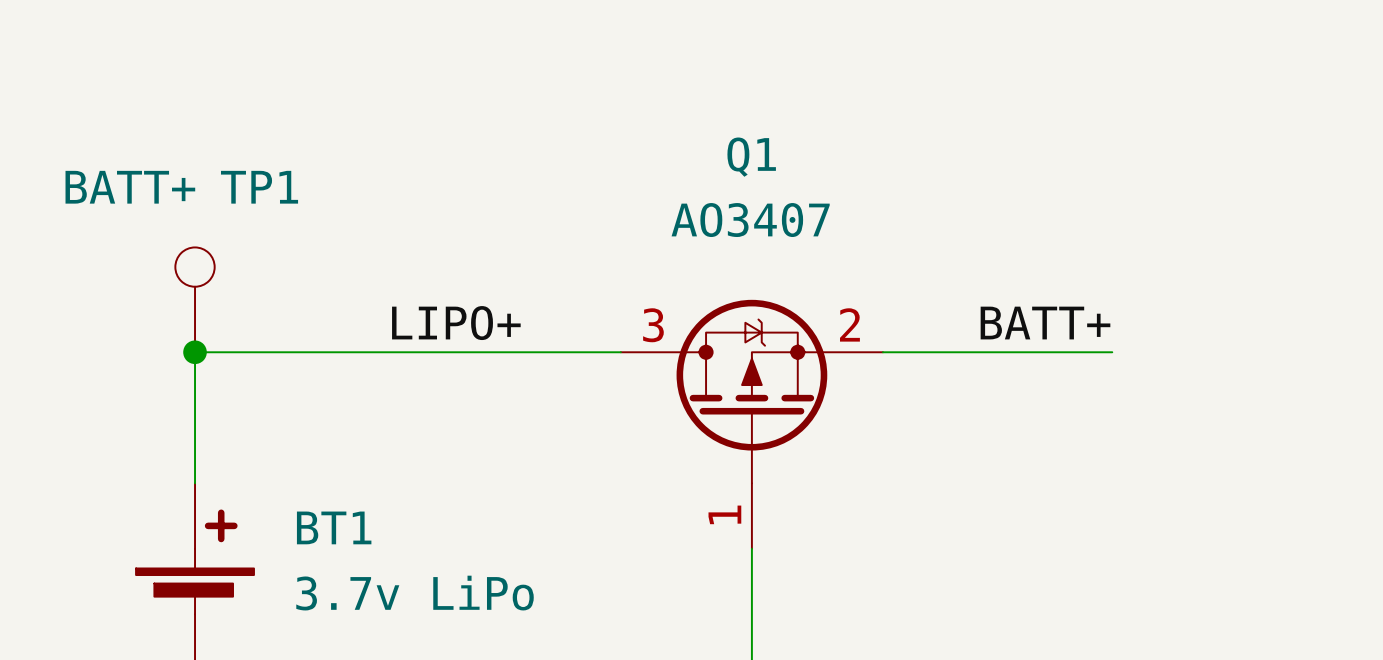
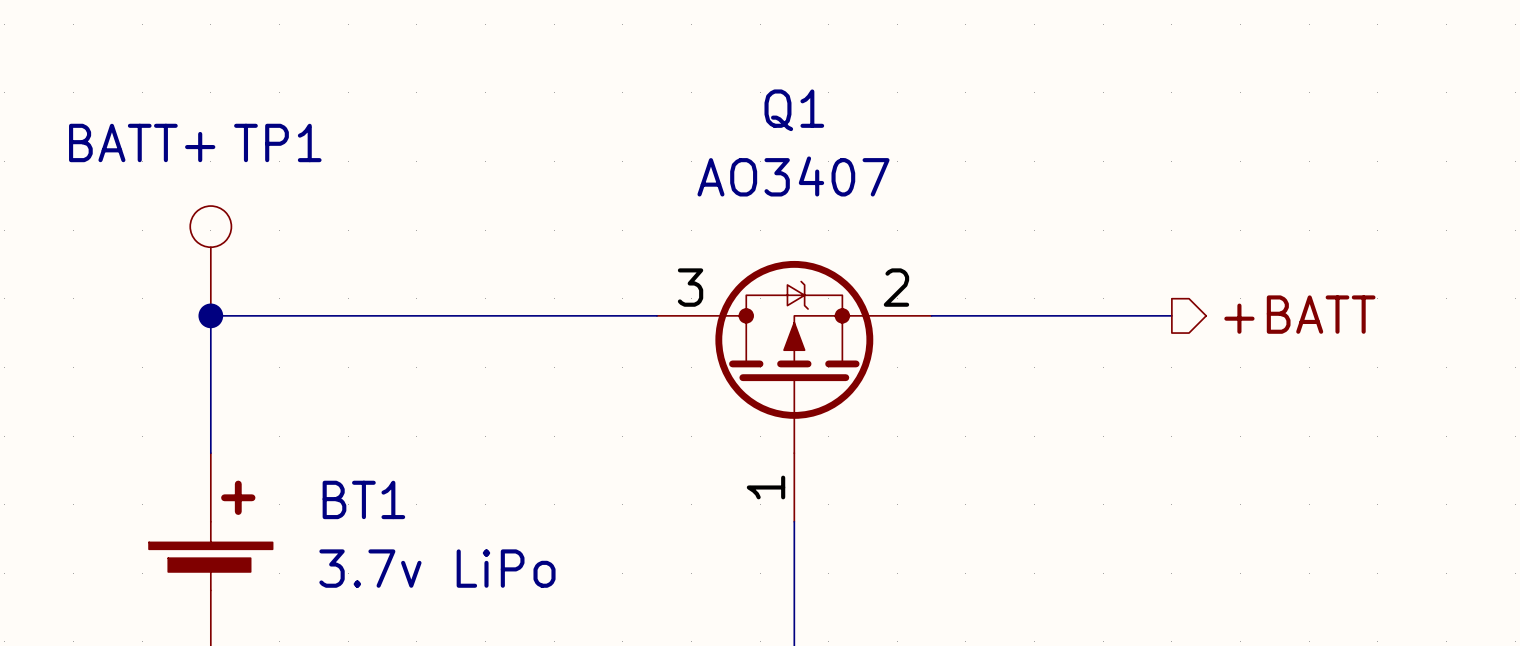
label: LIPO+ (456, 323) -> none
label: BATT+ (1045, 323) -> none
hierarchical label: none -> +BATT (1299, 314)

